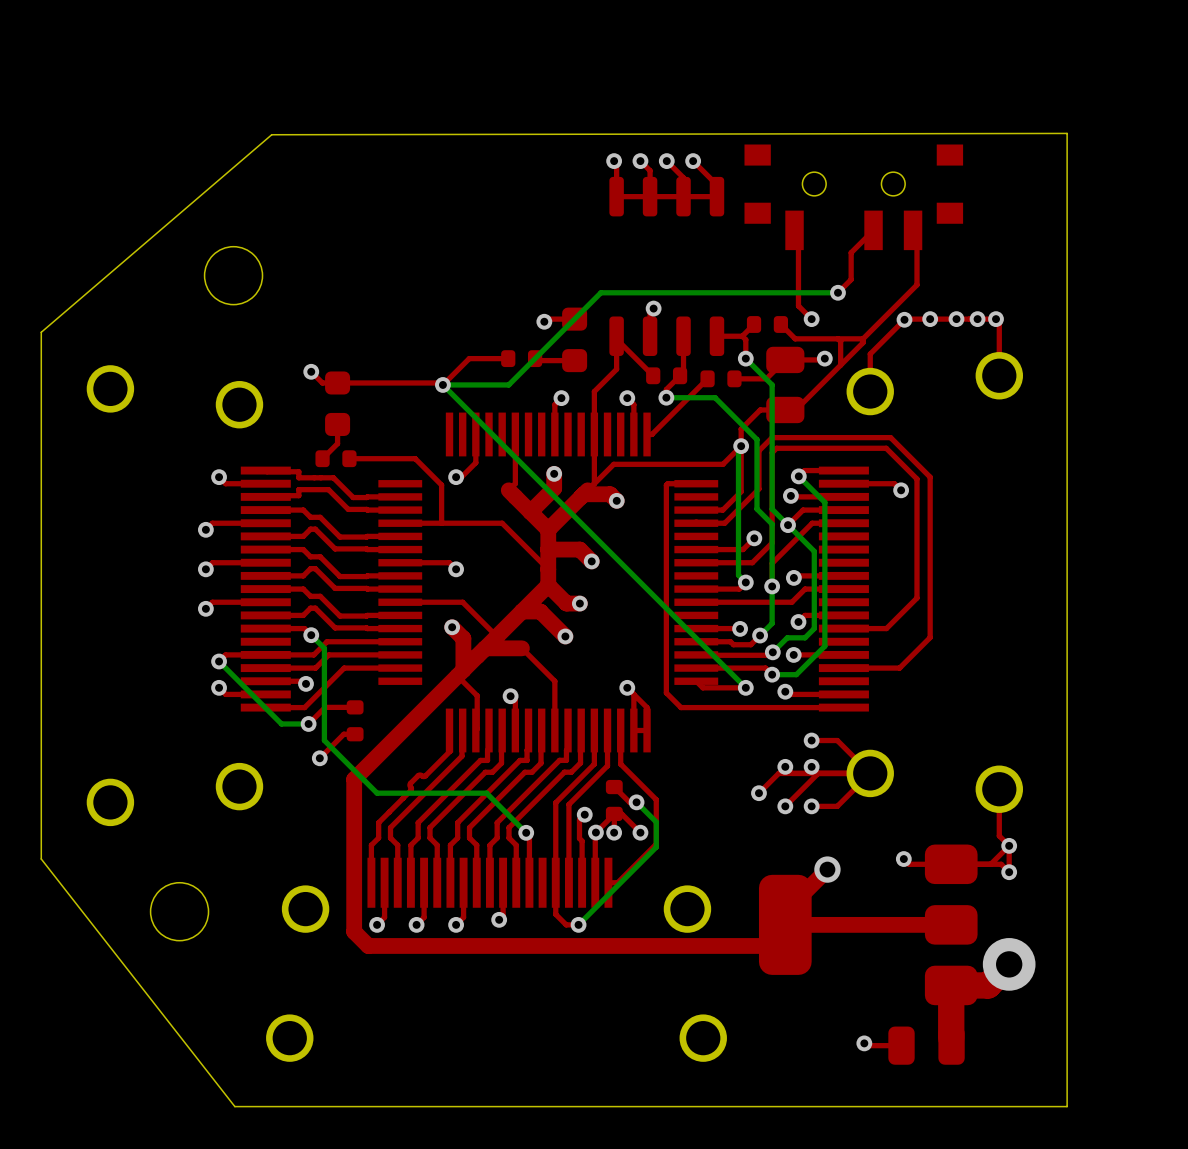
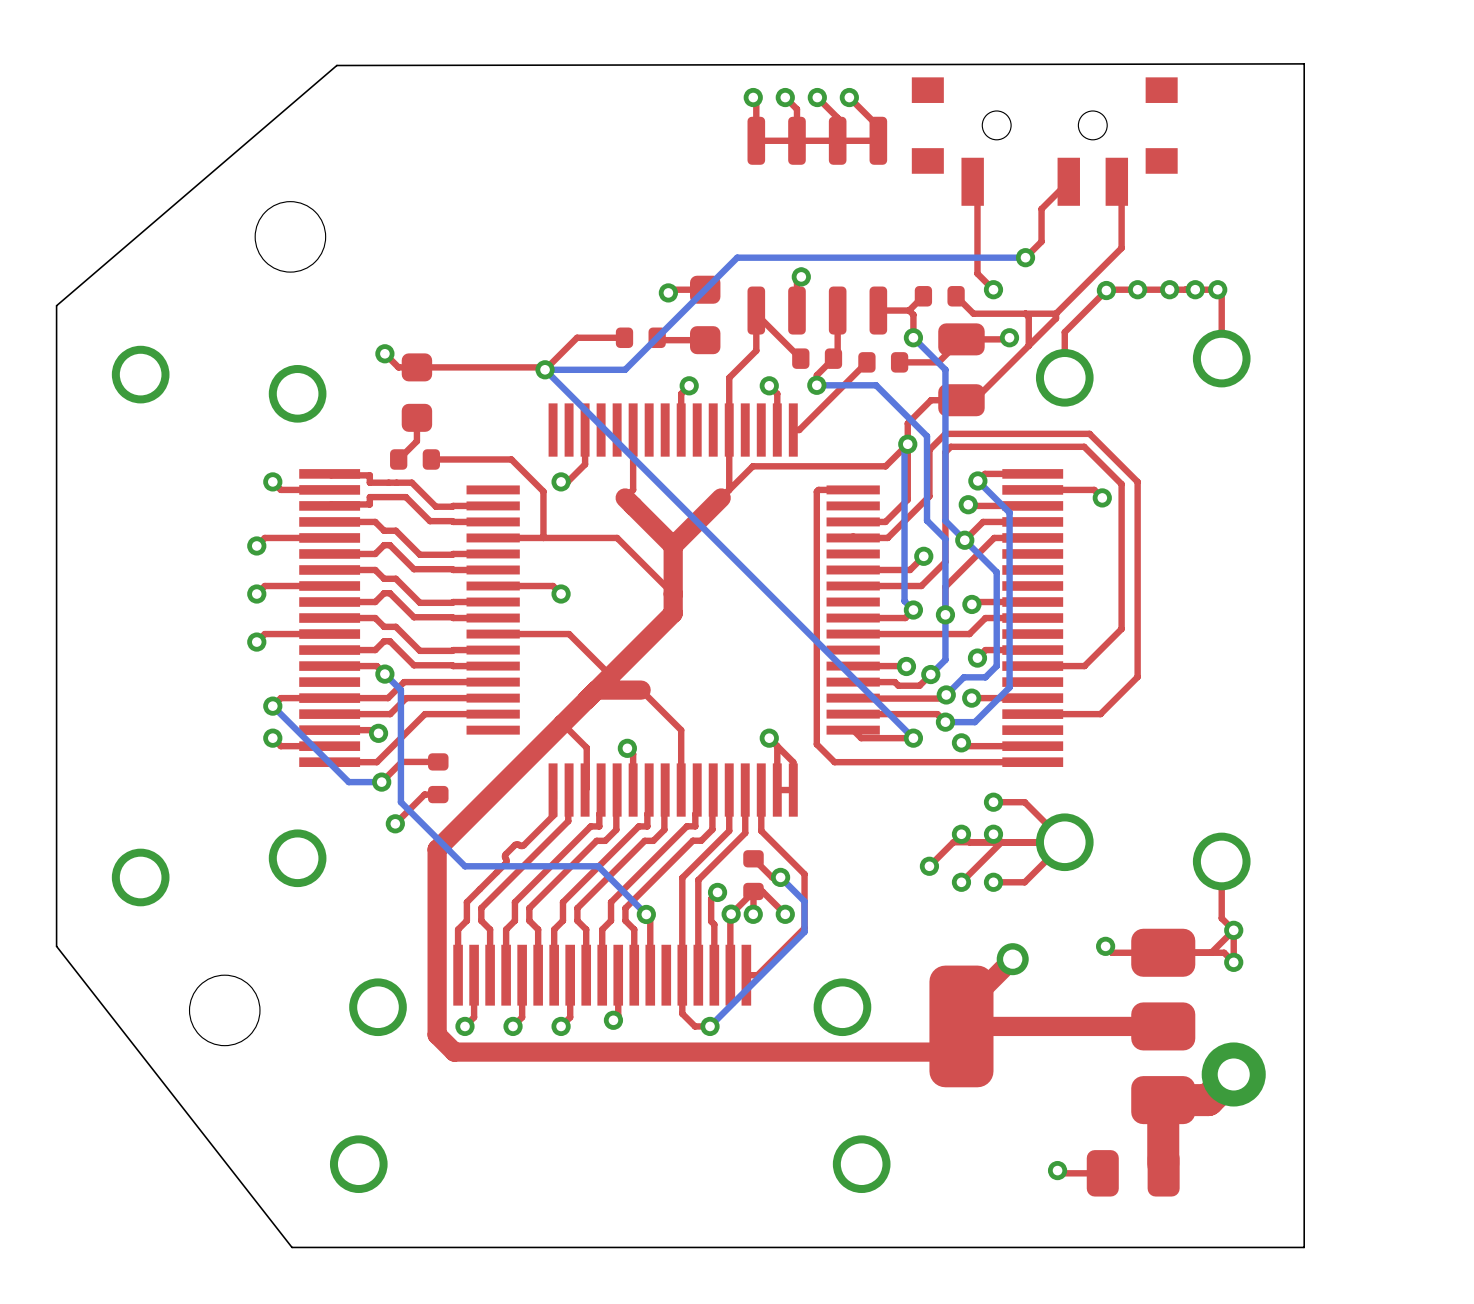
top track: (554, 473) (554, 488) (530, 512) -> none
via: (554, 473) -> none
top track: (583, 494) (610, 494) (616, 500) -> none
via: (616, 500) -> none
top track: (548, 549) (579, 549) (591, 561) -> none
via: (591, 561) -> none
top track: (548, 585) (566, 603) (579, 603) -> none
via: (579, 603) -> none
top track: (521, 611) (540, 611) (565, 636) -> none
top track: (452, 627) (463, 638) (463, 670) -> none
via: (452, 627) -> none
via: (565, 636) -> none

